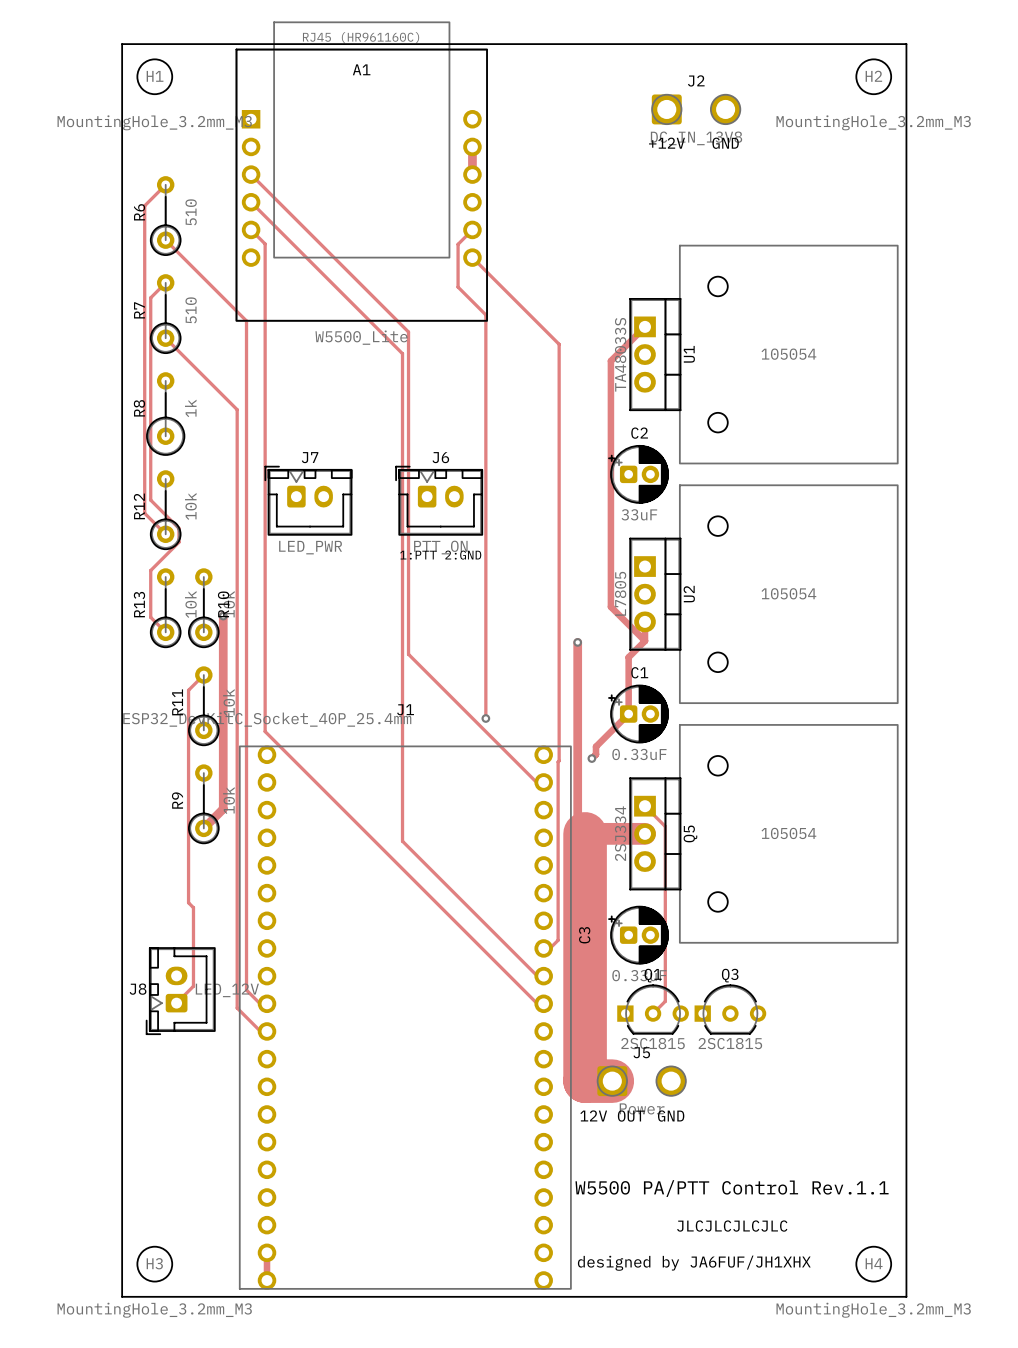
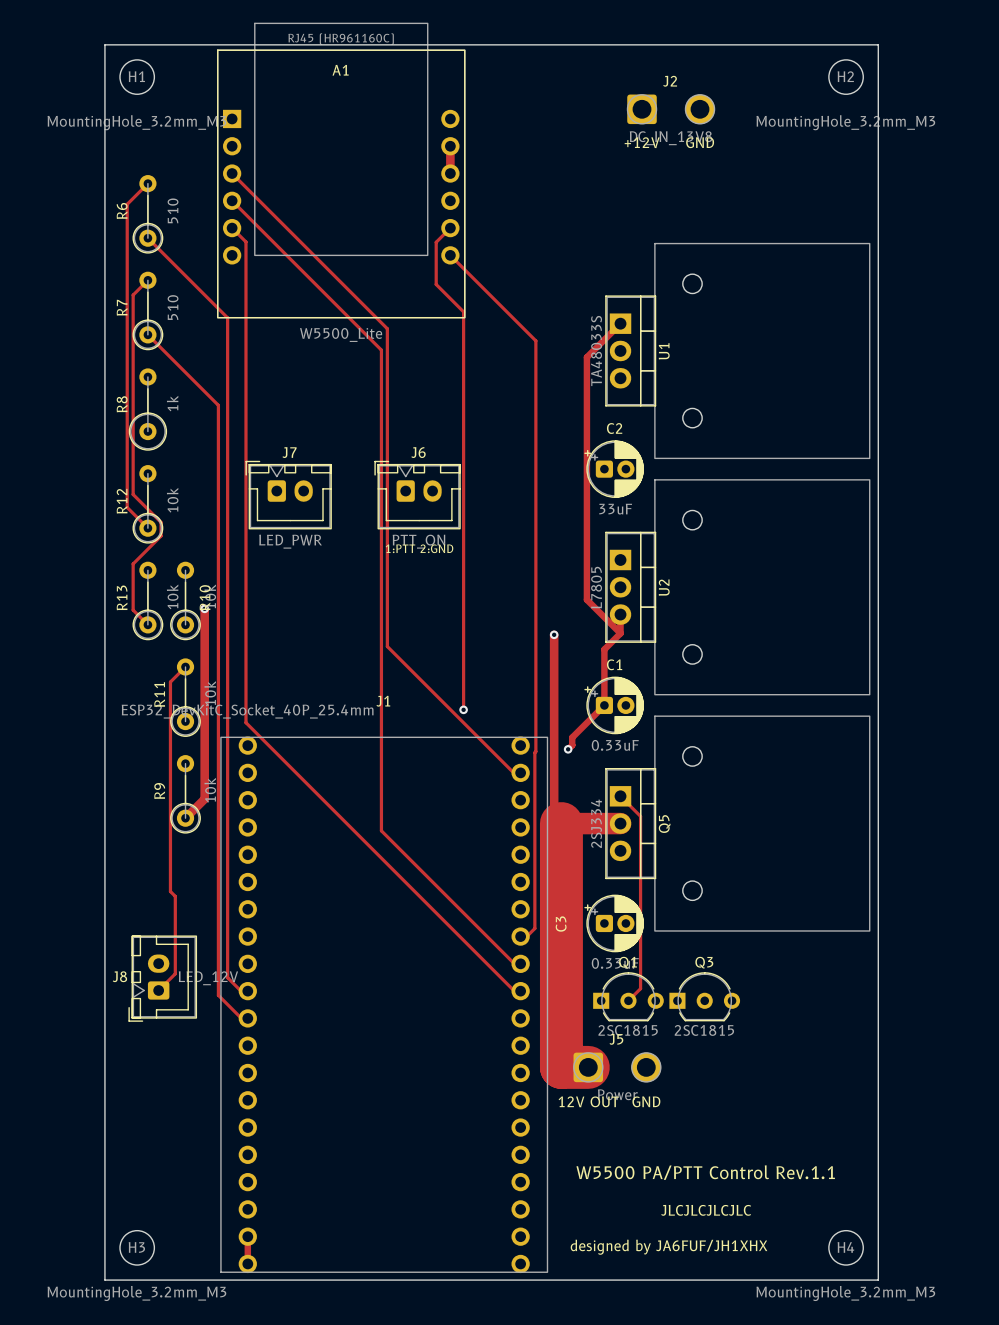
part value: 105054 (788, 354) -> none
part value: 105054 (788, 593) -> none
part value: 105054 (788, 833) -> none

